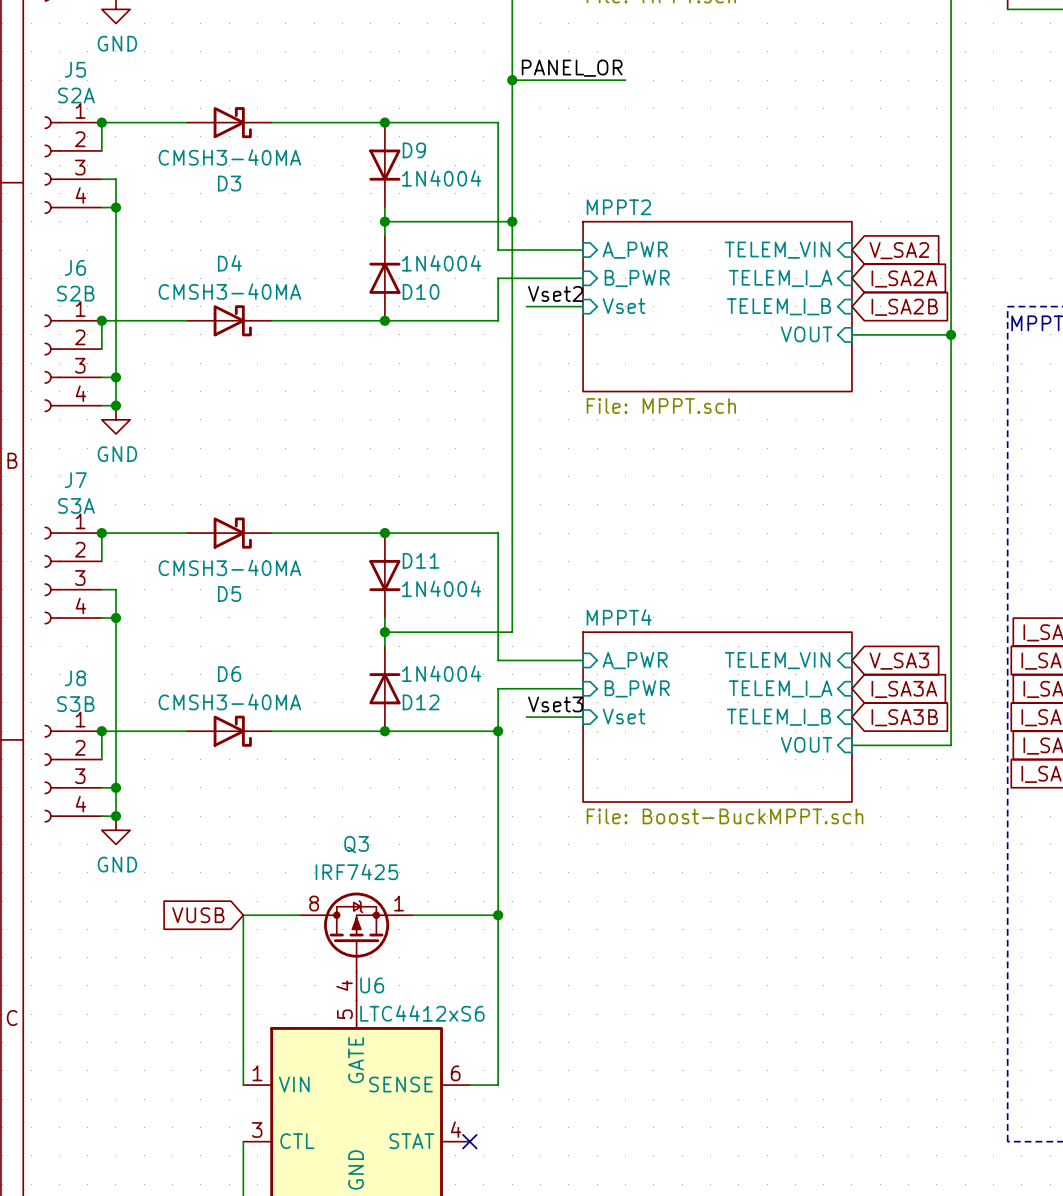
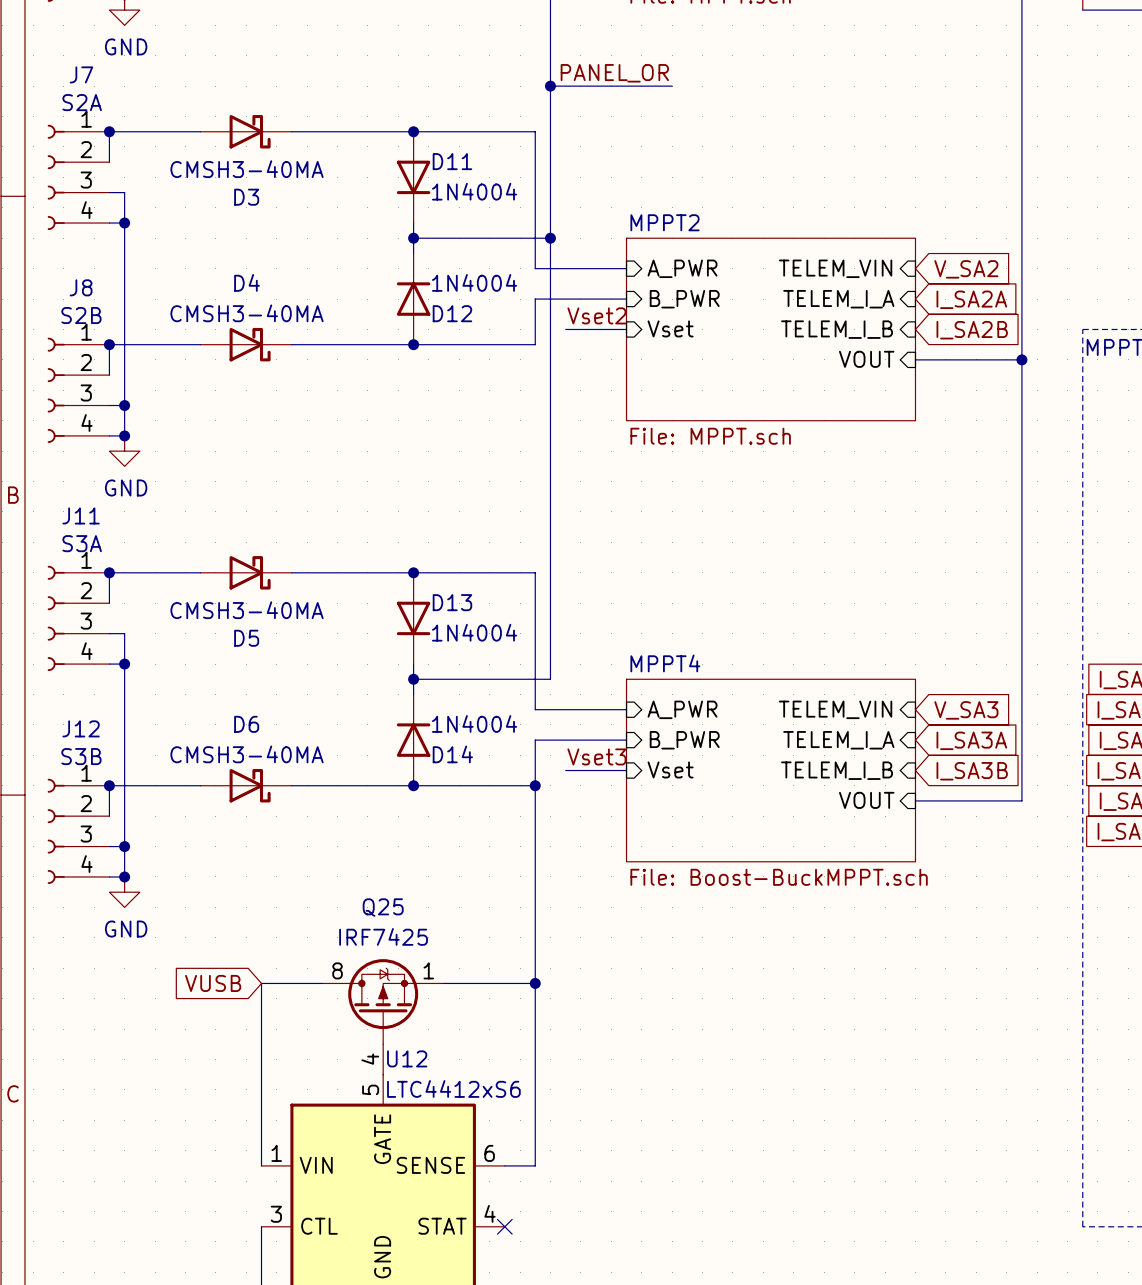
J5 name: J5 (75, 69) -> J7 (81, 74)
D9 name: D9 (414, 150) -> D11 (452, 161)
J6 name: J6 (75, 267) -> J8 (81, 287)
D10 name: D10 (421, 291) -> D12 (452, 313)
J7 name: J7 (75, 480) -> J11 (81, 515)
D11 name: D11 (421, 560) -> D13 (452, 602)
J8 name: J8 (75, 678) -> J12 (81, 728)
D12 name: D12 (421, 702) -> D14 (452, 754)
Q3 name: Q3 (356, 844) -> Q25 (383, 907)
U6 name: U6 (372, 985) -> U12 (407, 1058)

